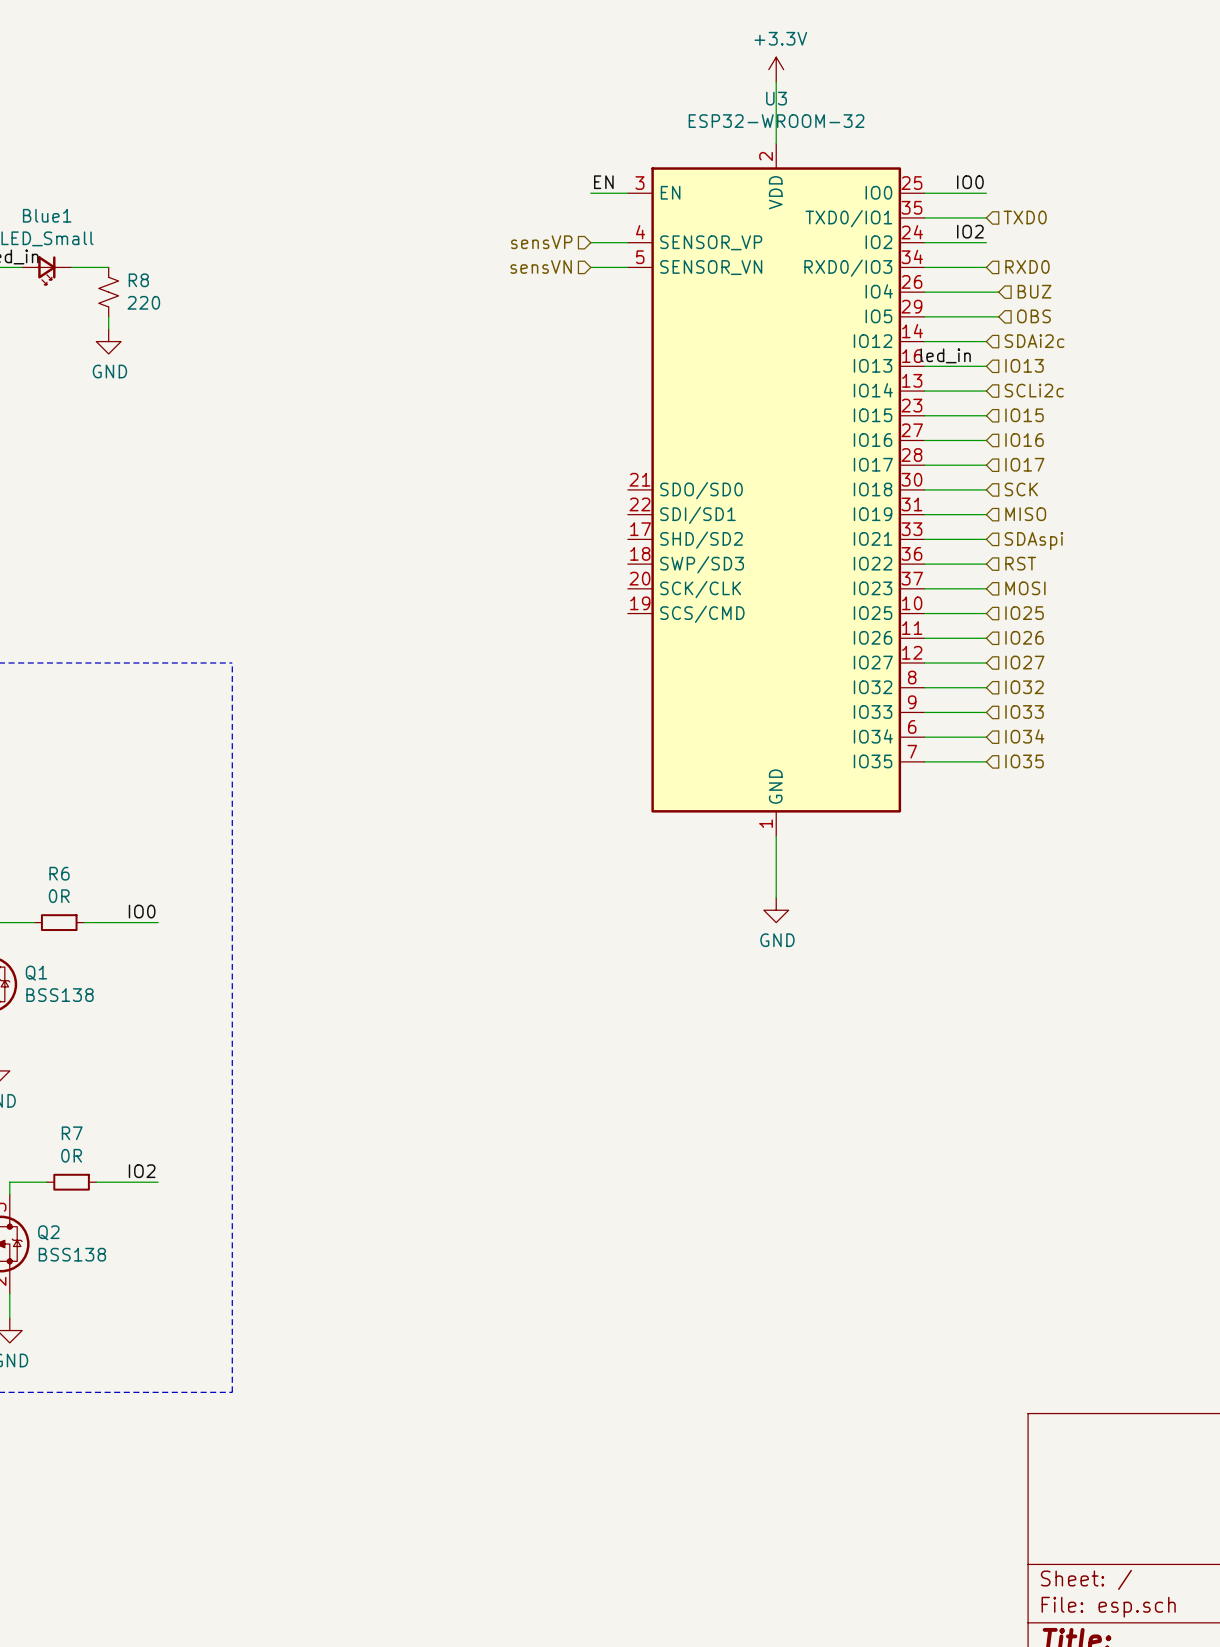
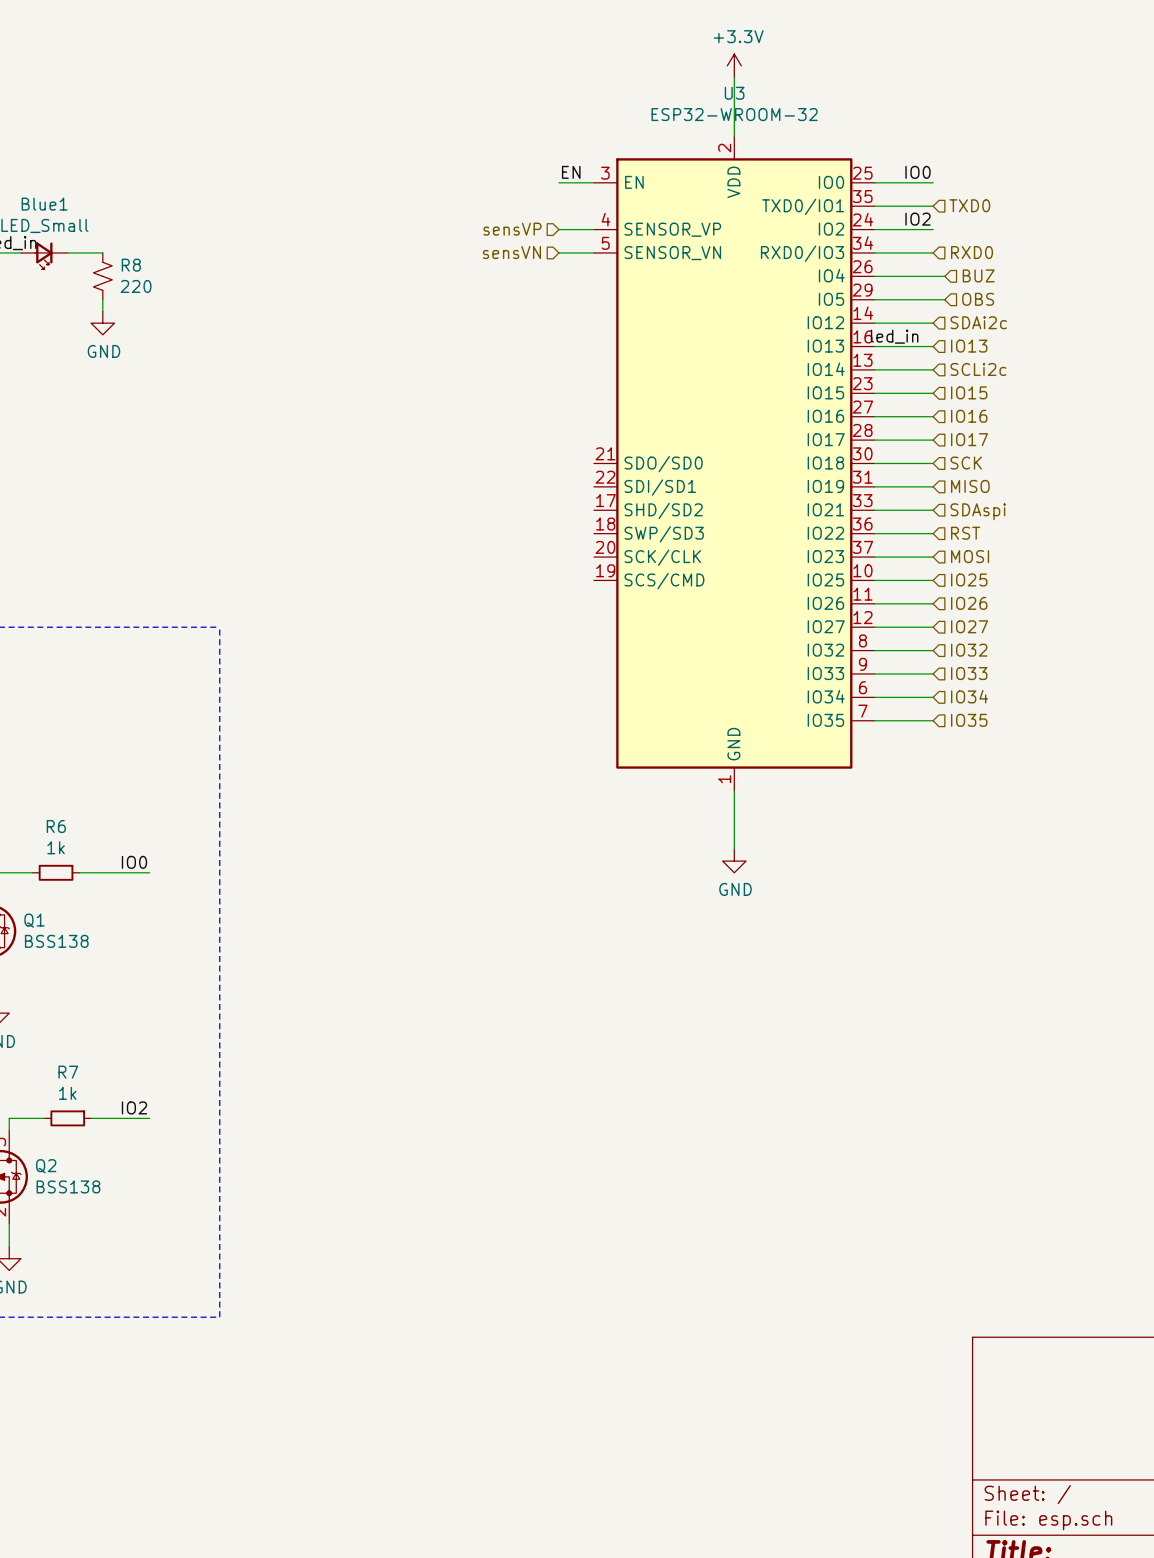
R6 value: 0R (59, 896) -> 1k (56, 847)
R7 value: 0R (71, 1155) -> 1k (67, 1093)

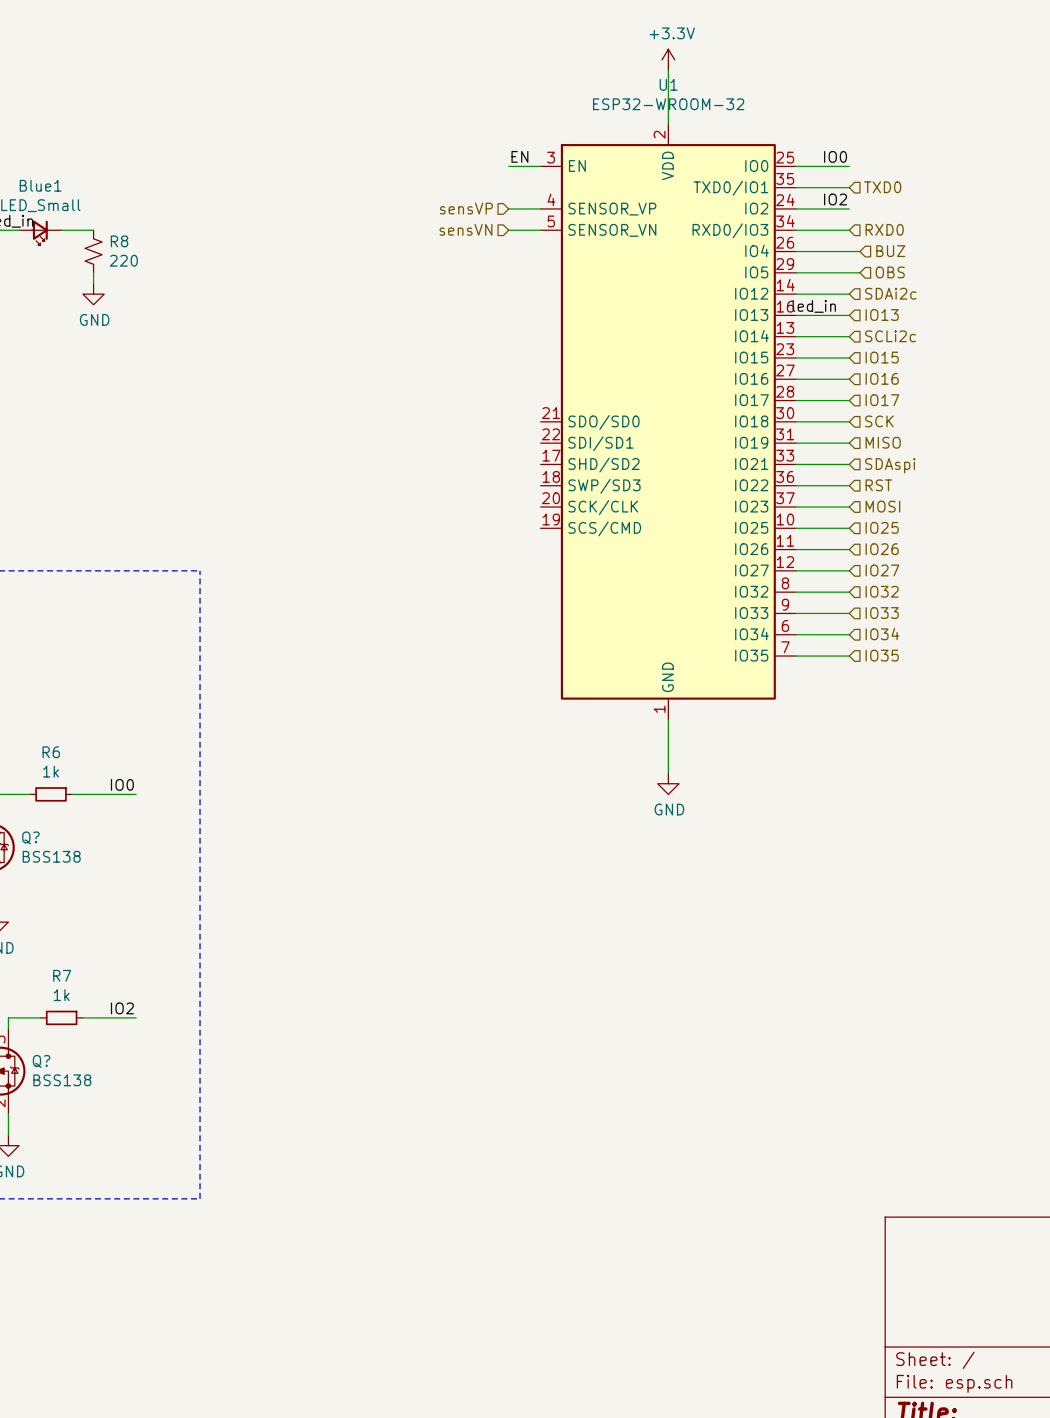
U3 name: U3 (734, 93) -> U1 (668, 84)
Q1 name: Q1 (34, 920) -> Q? (30, 837)
Q2 name: Q2 (46, 1166) -> Q? (41, 1061)

